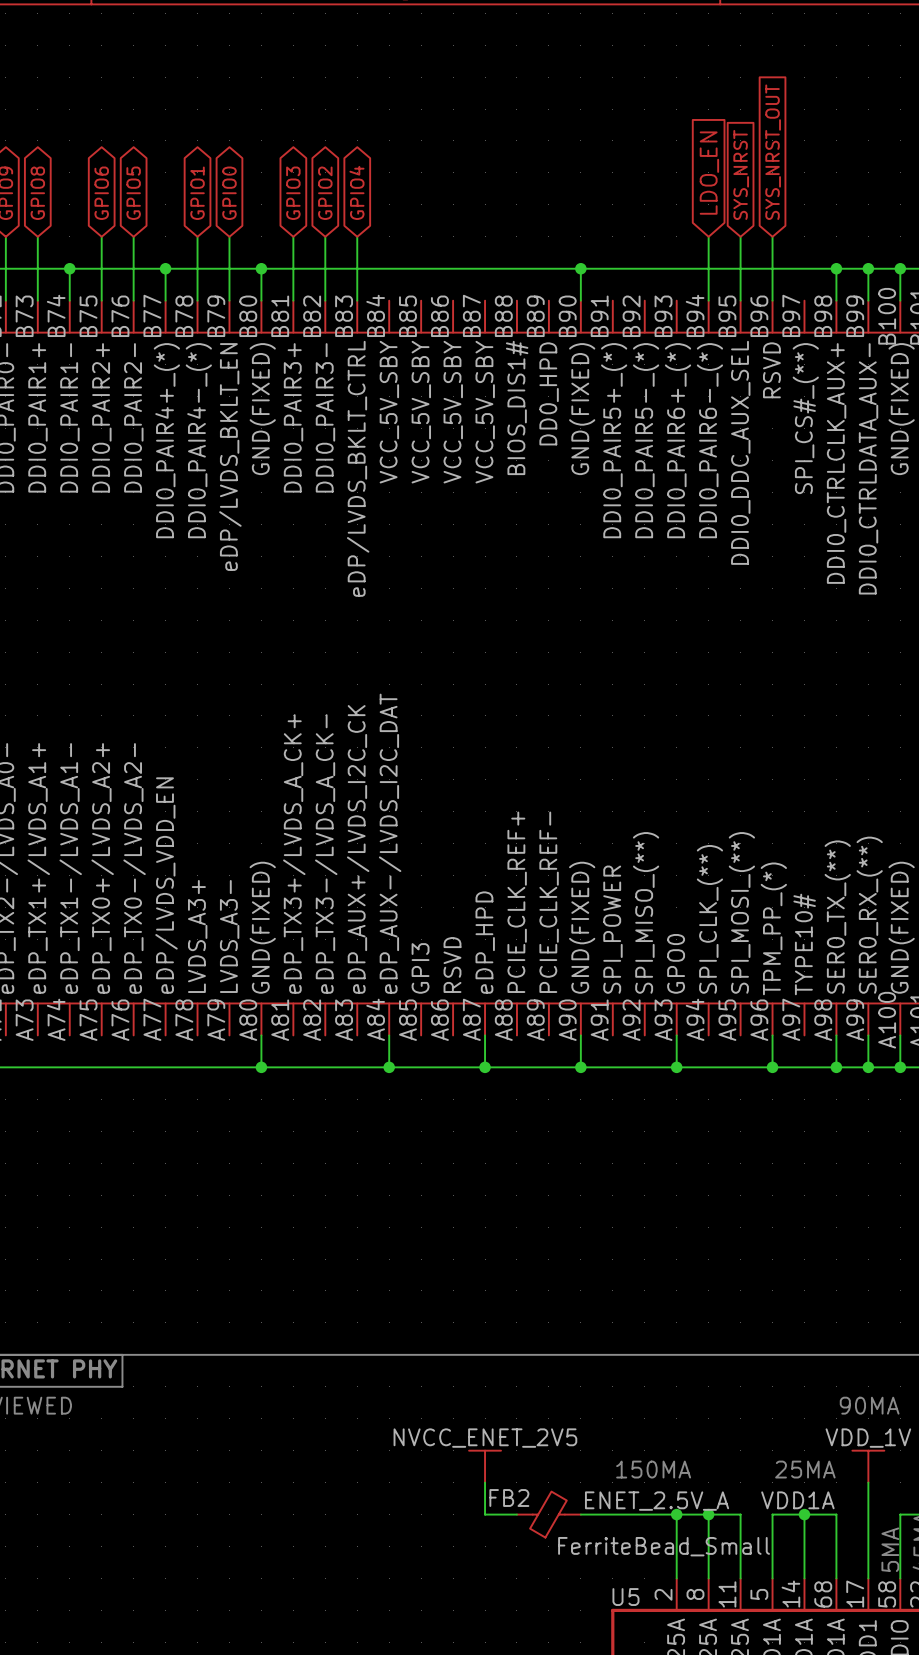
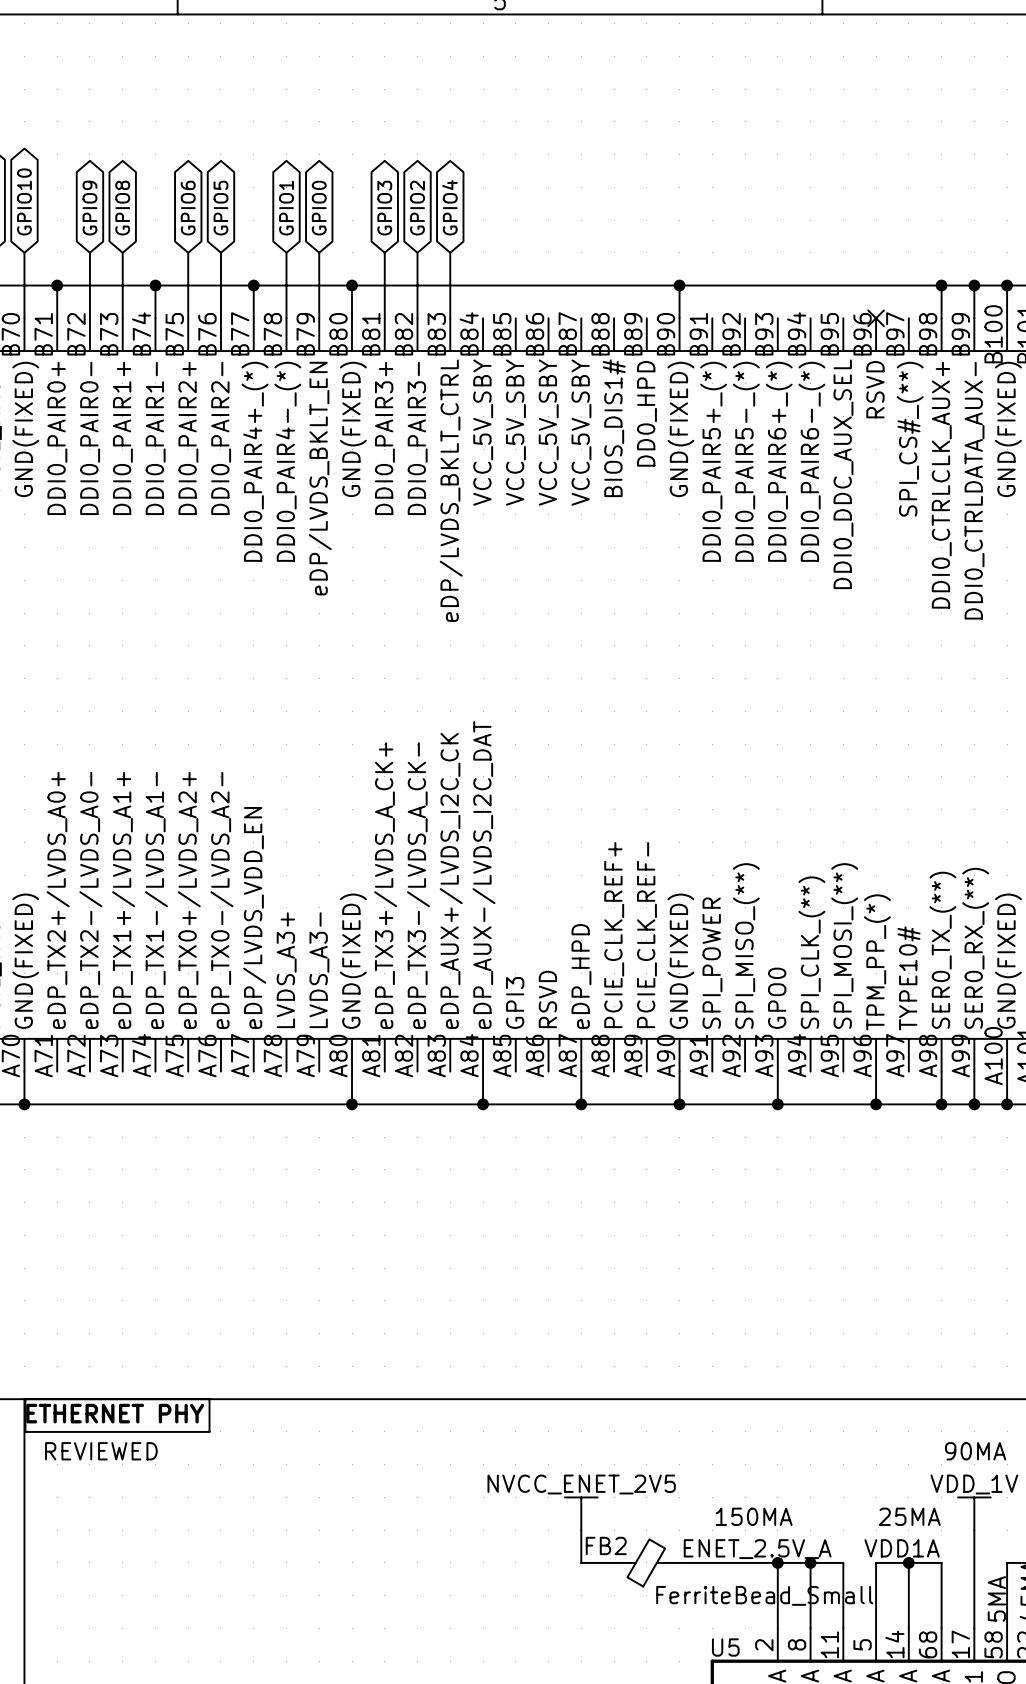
global label: SYS_NRST_OUT (773, 152) -> none
global label: LDO_EN (709, 173) -> none
global label: SYS_NRST (741, 174) -> none
wire: (708, 236) (708, 300) -> none
wire: (740, 236) (740, 300) -> none
wire: (772, 236) (772, 300) -> none
no-connect mark: none -> (876, 318)

